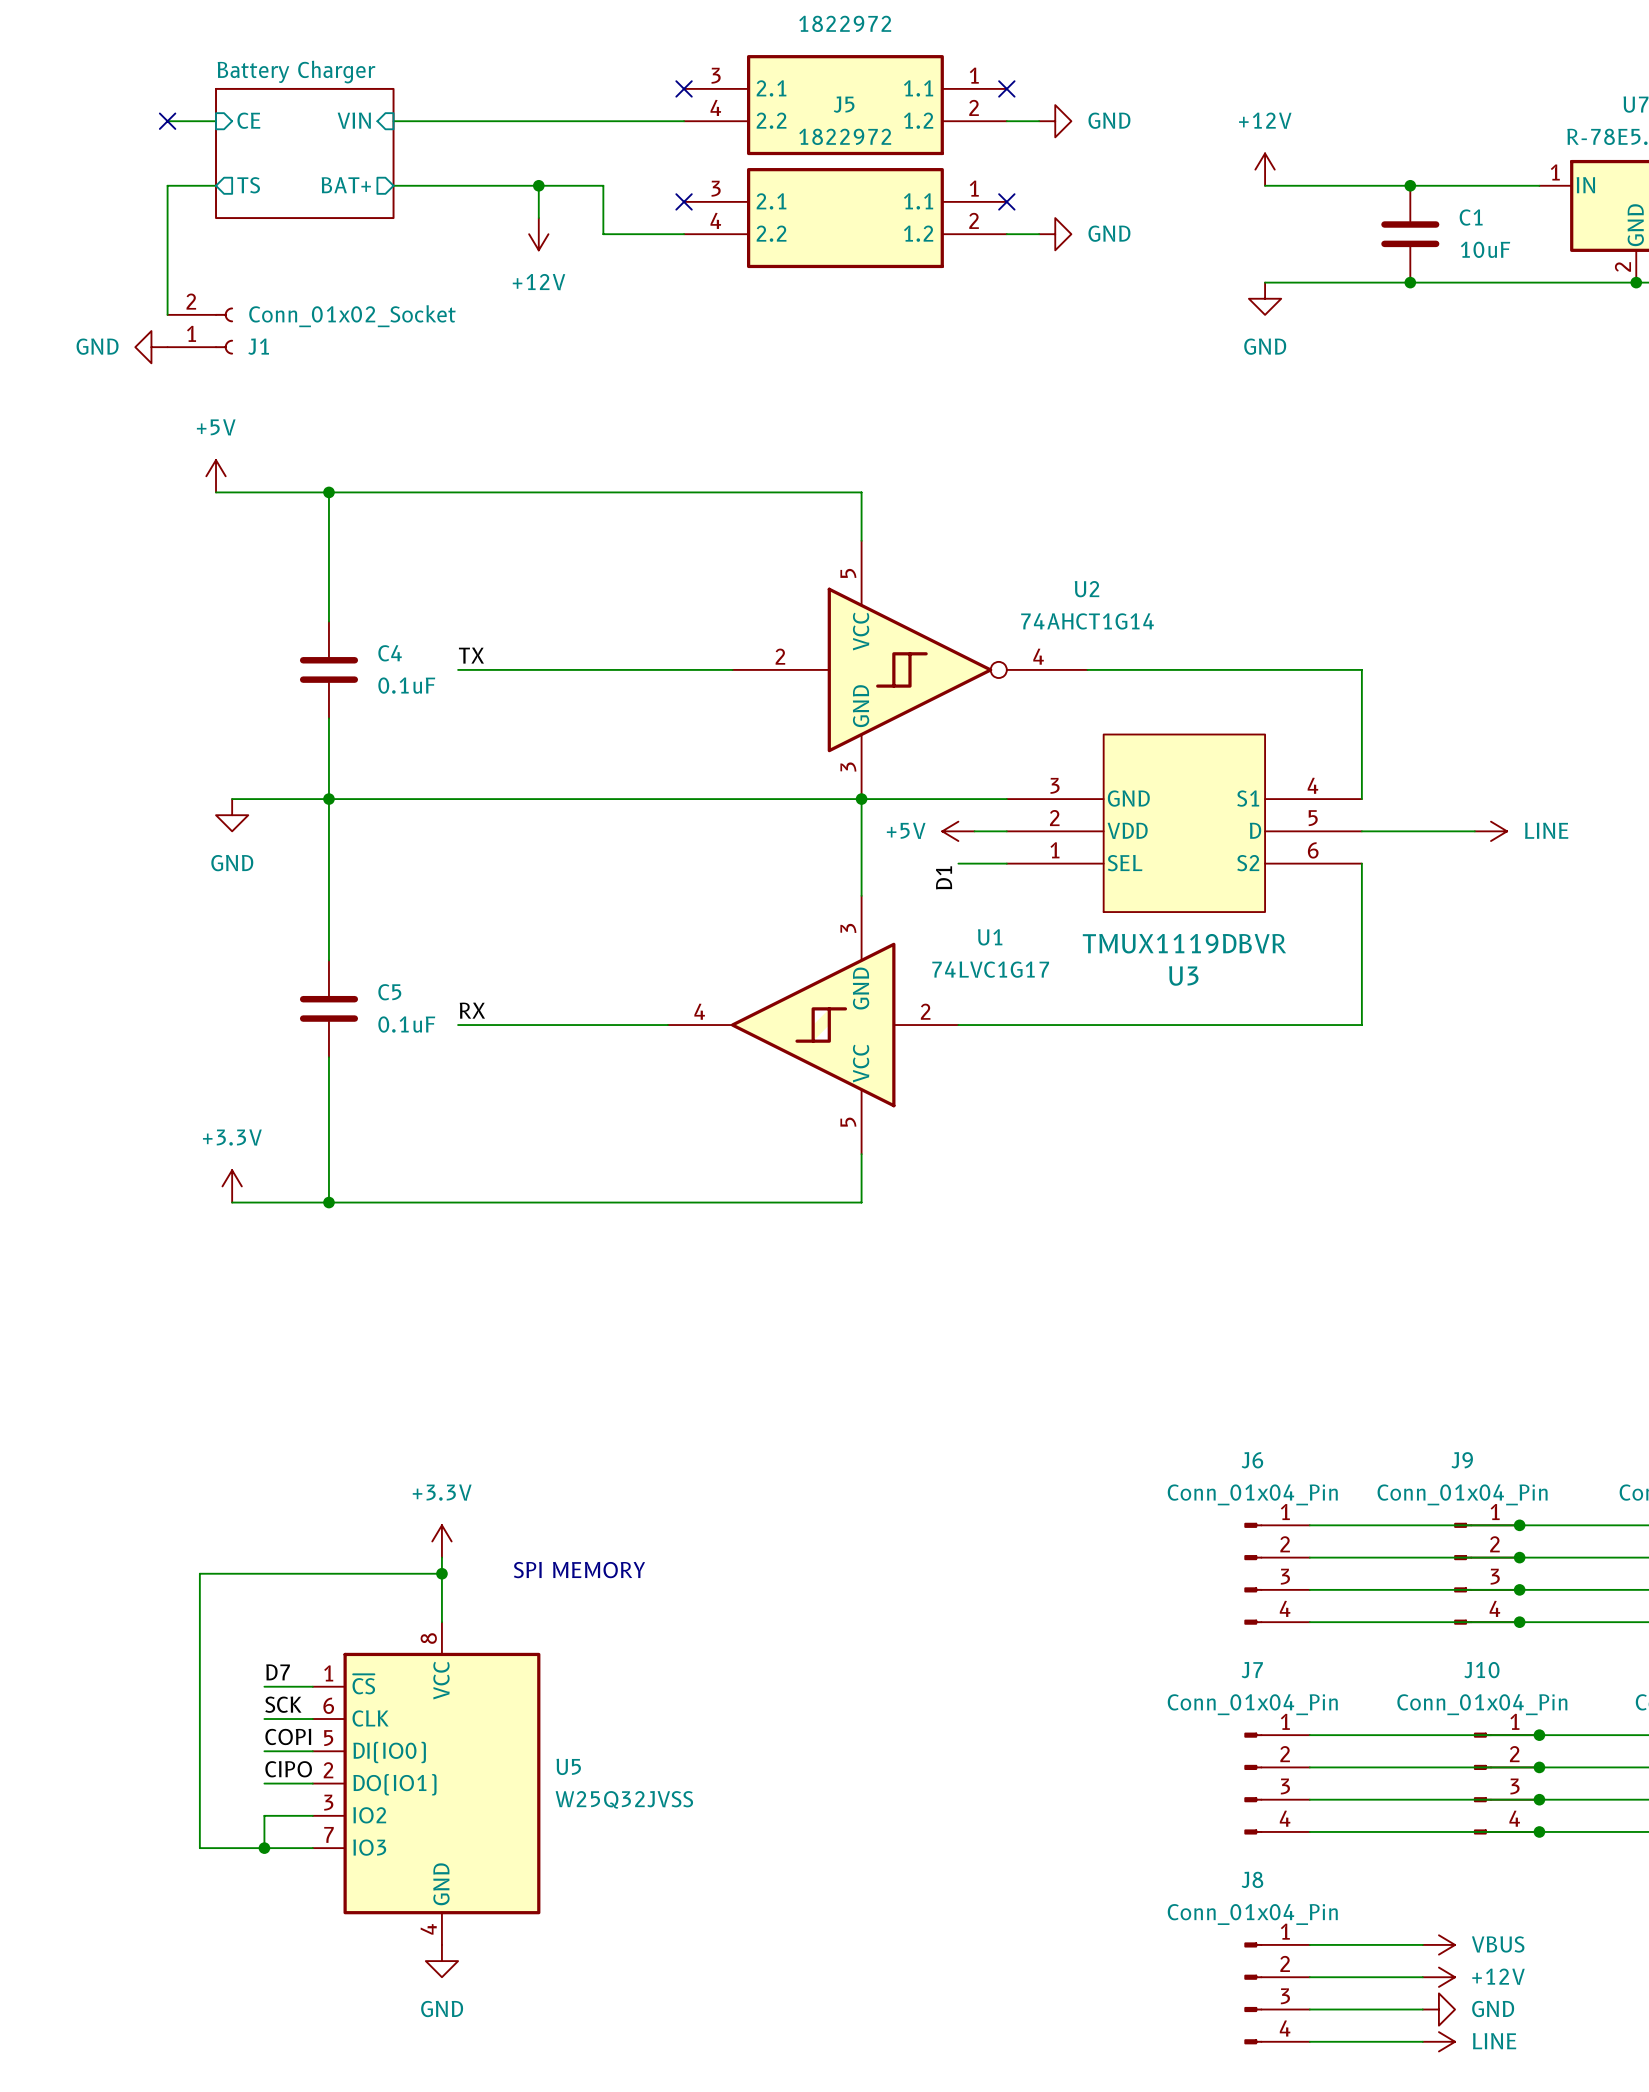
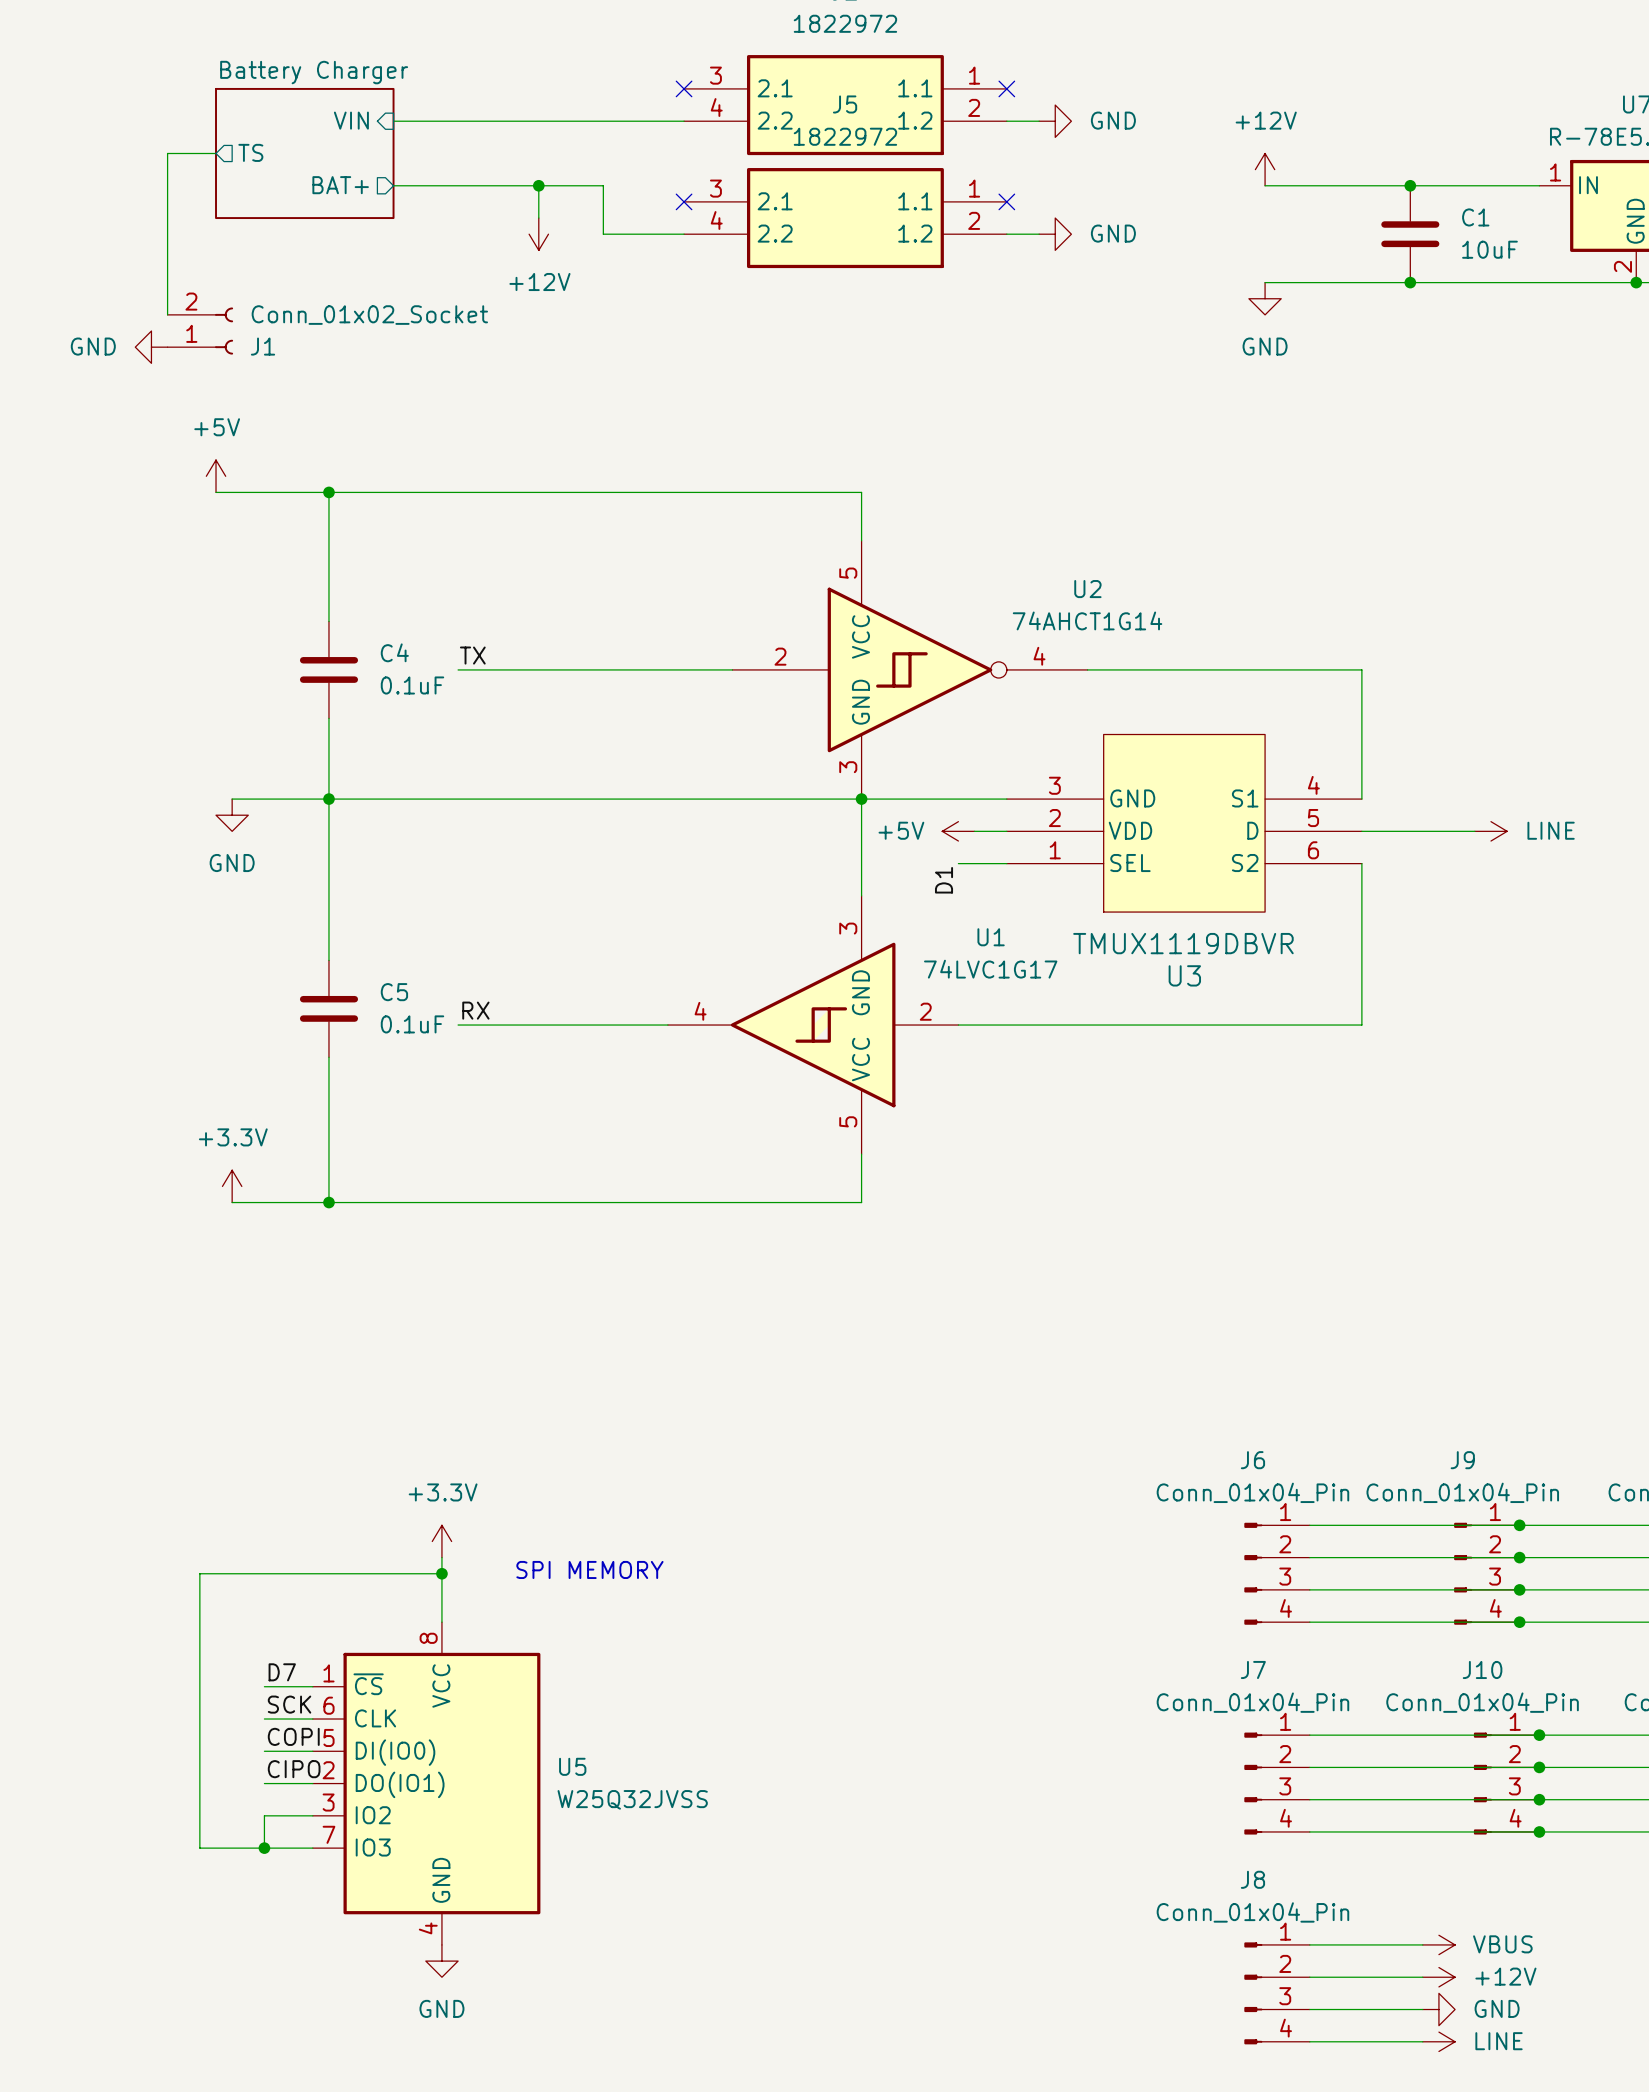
sheet pin: CE (248, 120) -> none
wire: (167, 121) (216, 121) -> none
no-connect mark: (167, 121) -> none
wire: (167, 185) (216, 185) -> (167, 185) (167, 153) (216, 153)
sheet pin position: TS (248, 185) -> TS (250, 152)

